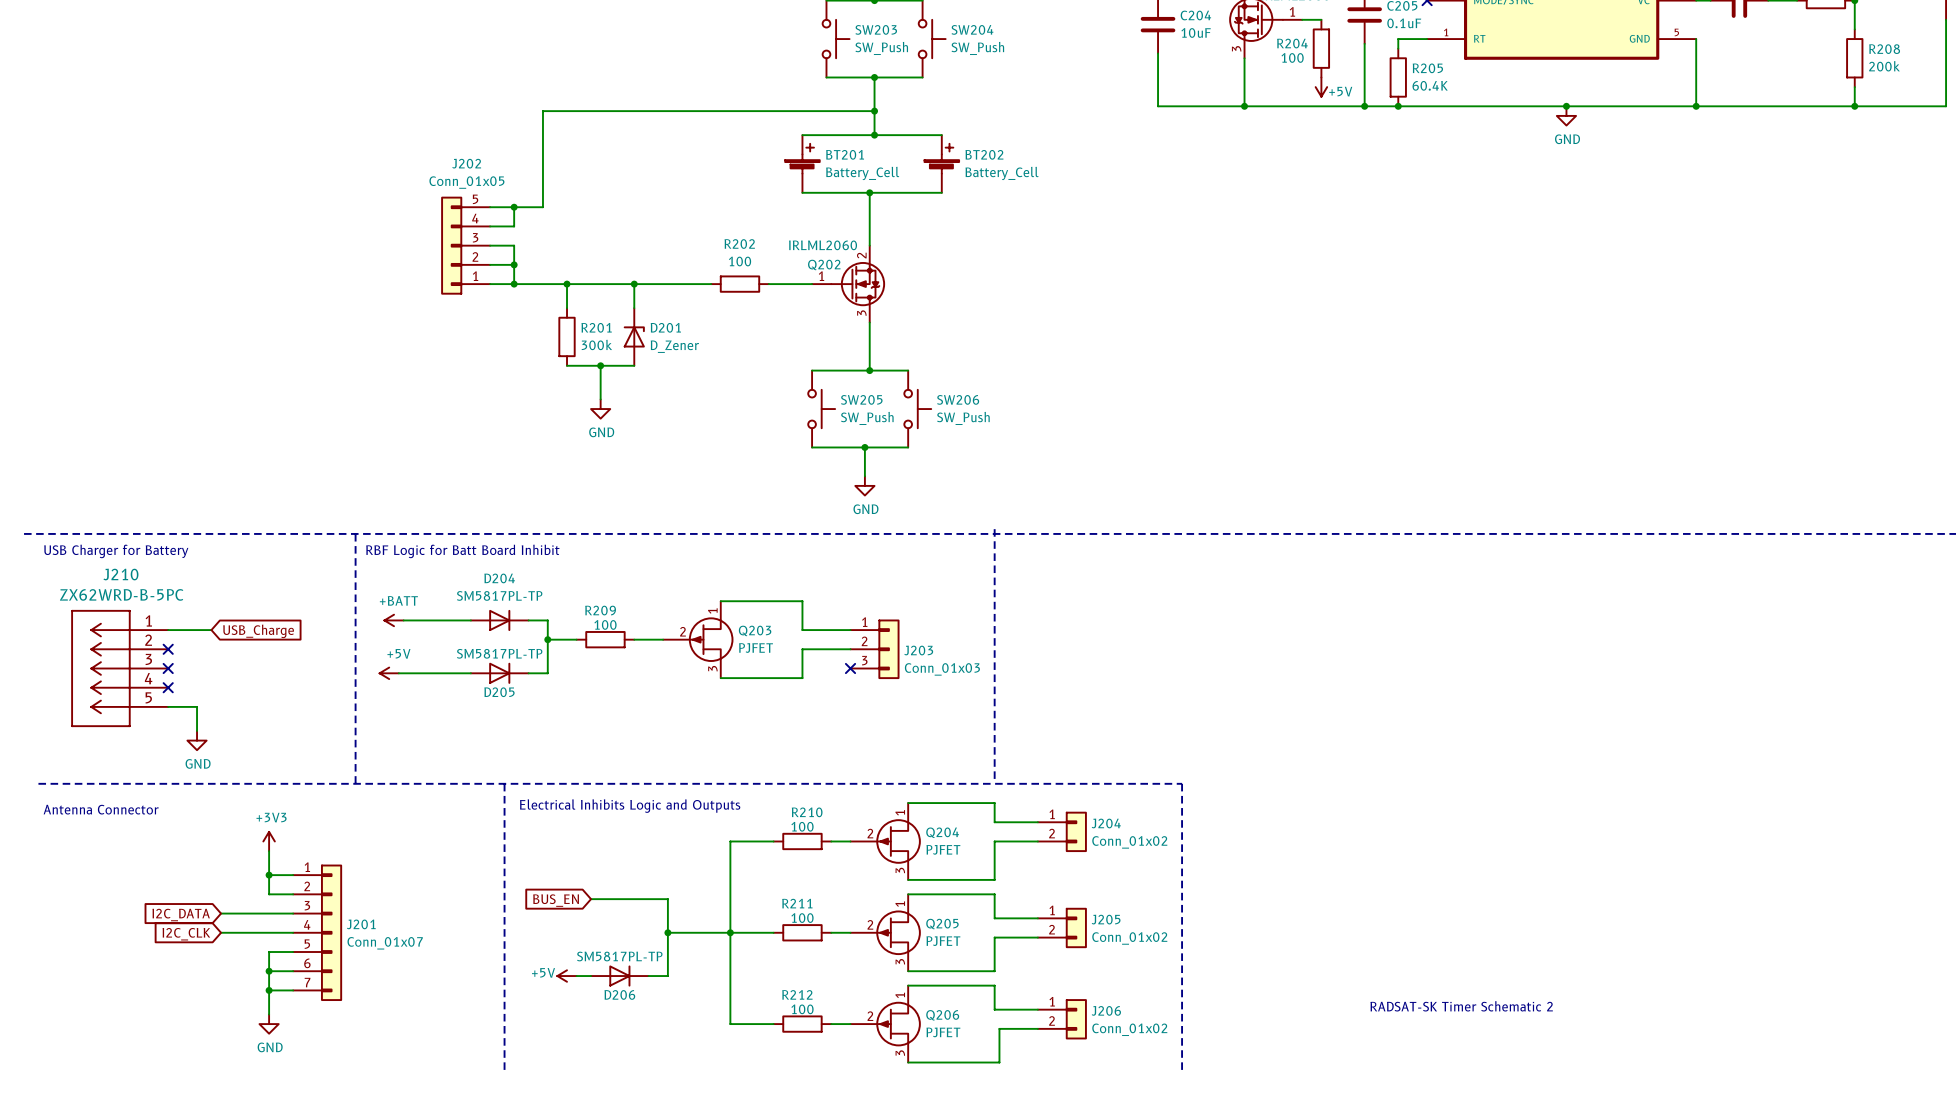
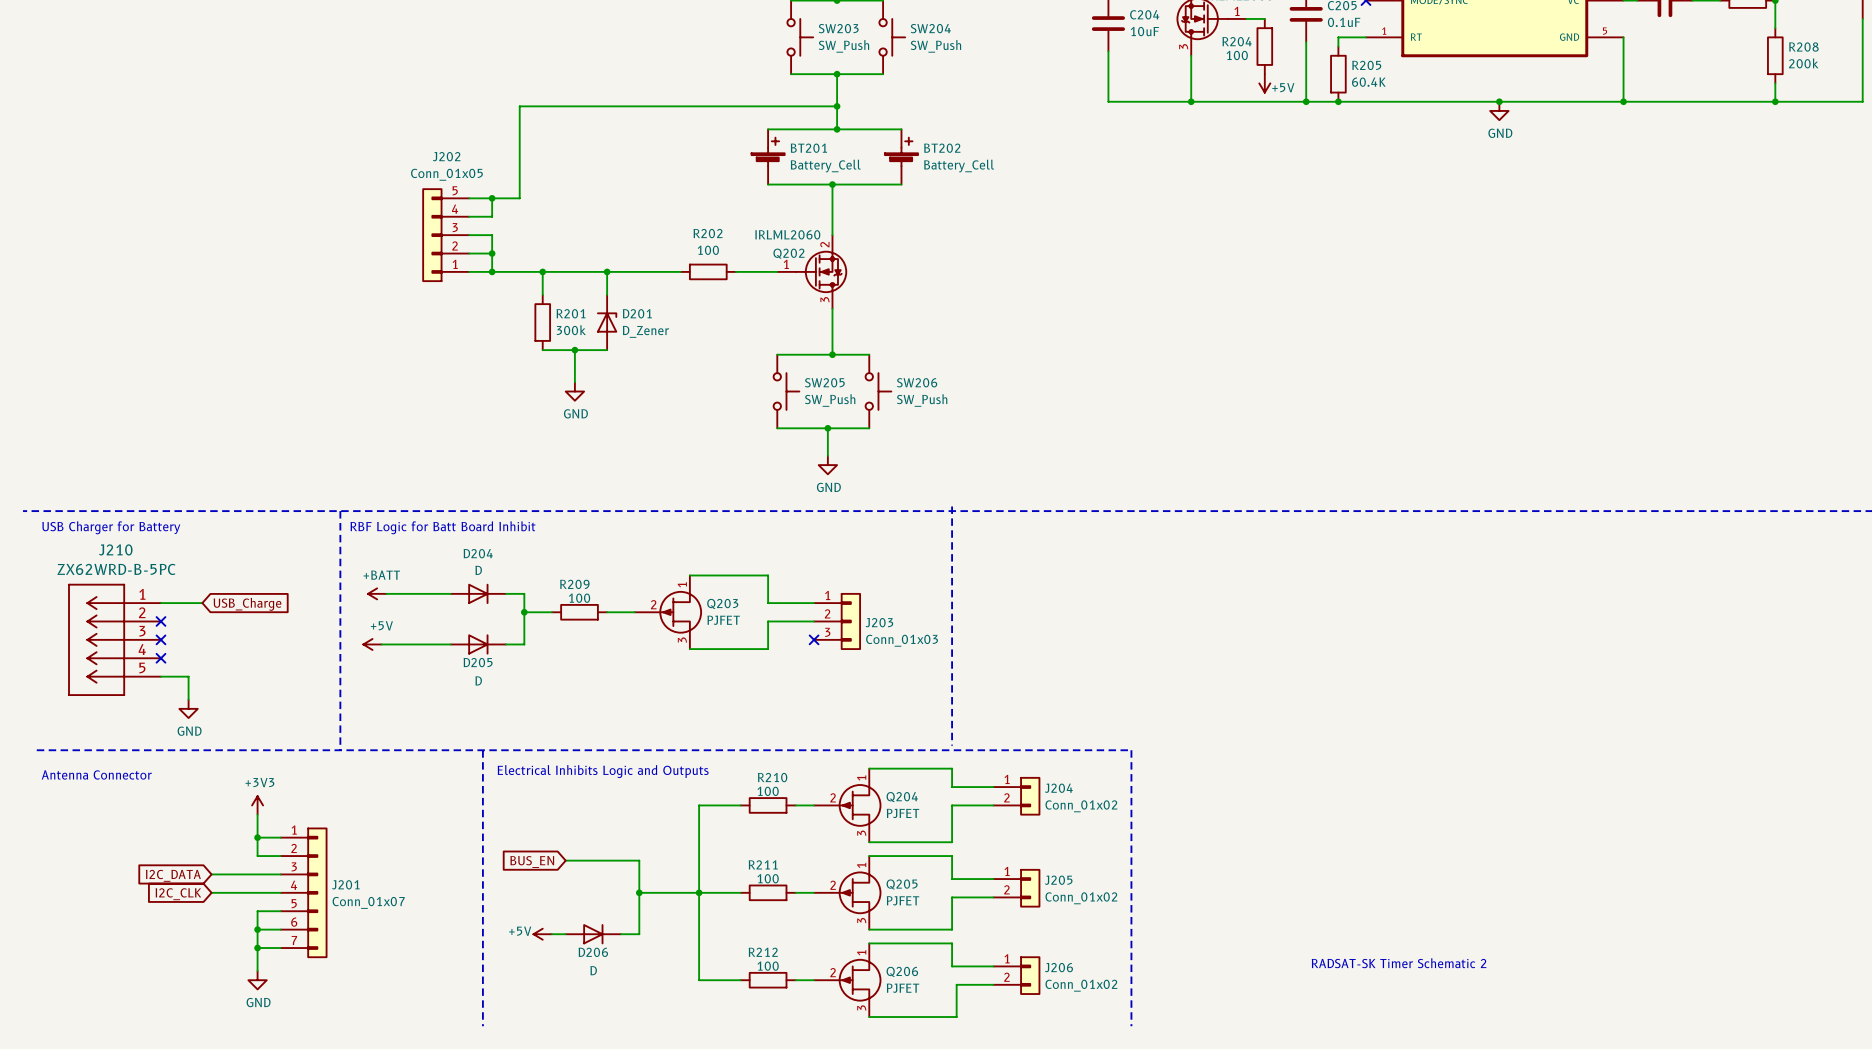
D204 value: SM5817PL-TP (499, 595) -> D (478, 570)
D205 value: SM5817PL-TP (499, 653) -> D (478, 680)
D206 value: SM5817PL-TP (619, 956) -> D (593, 970)

